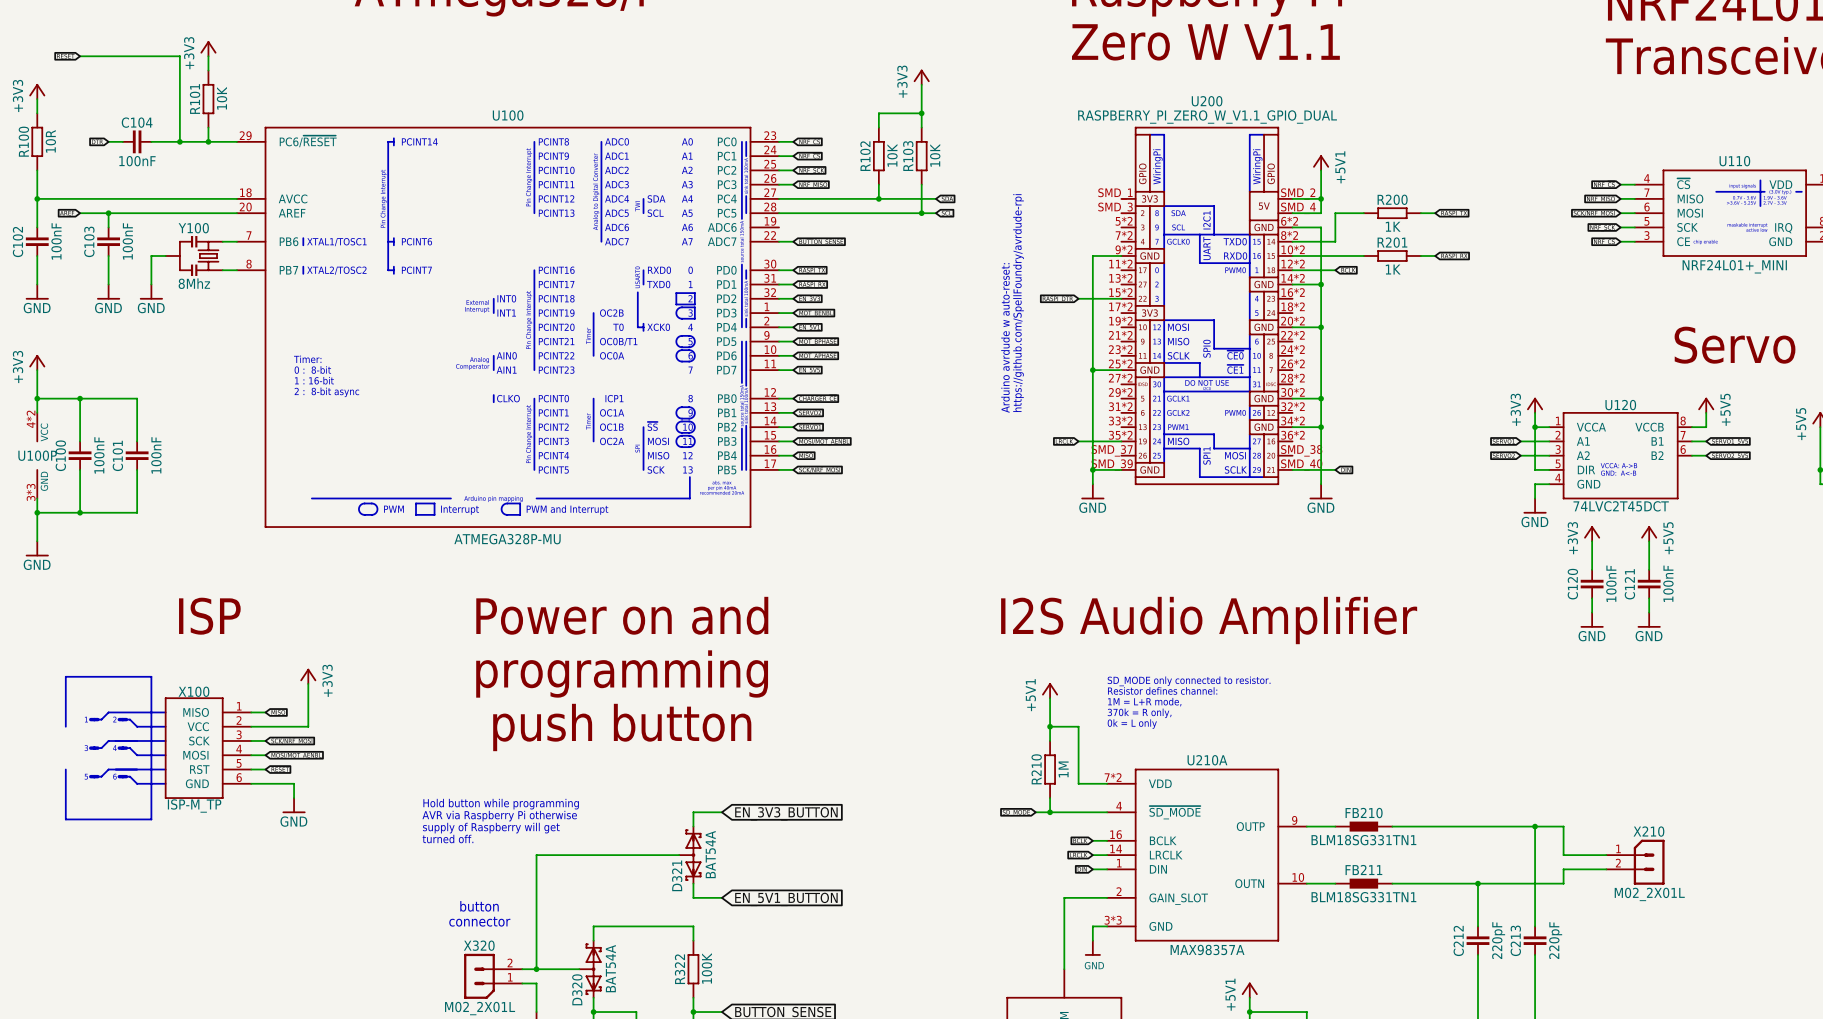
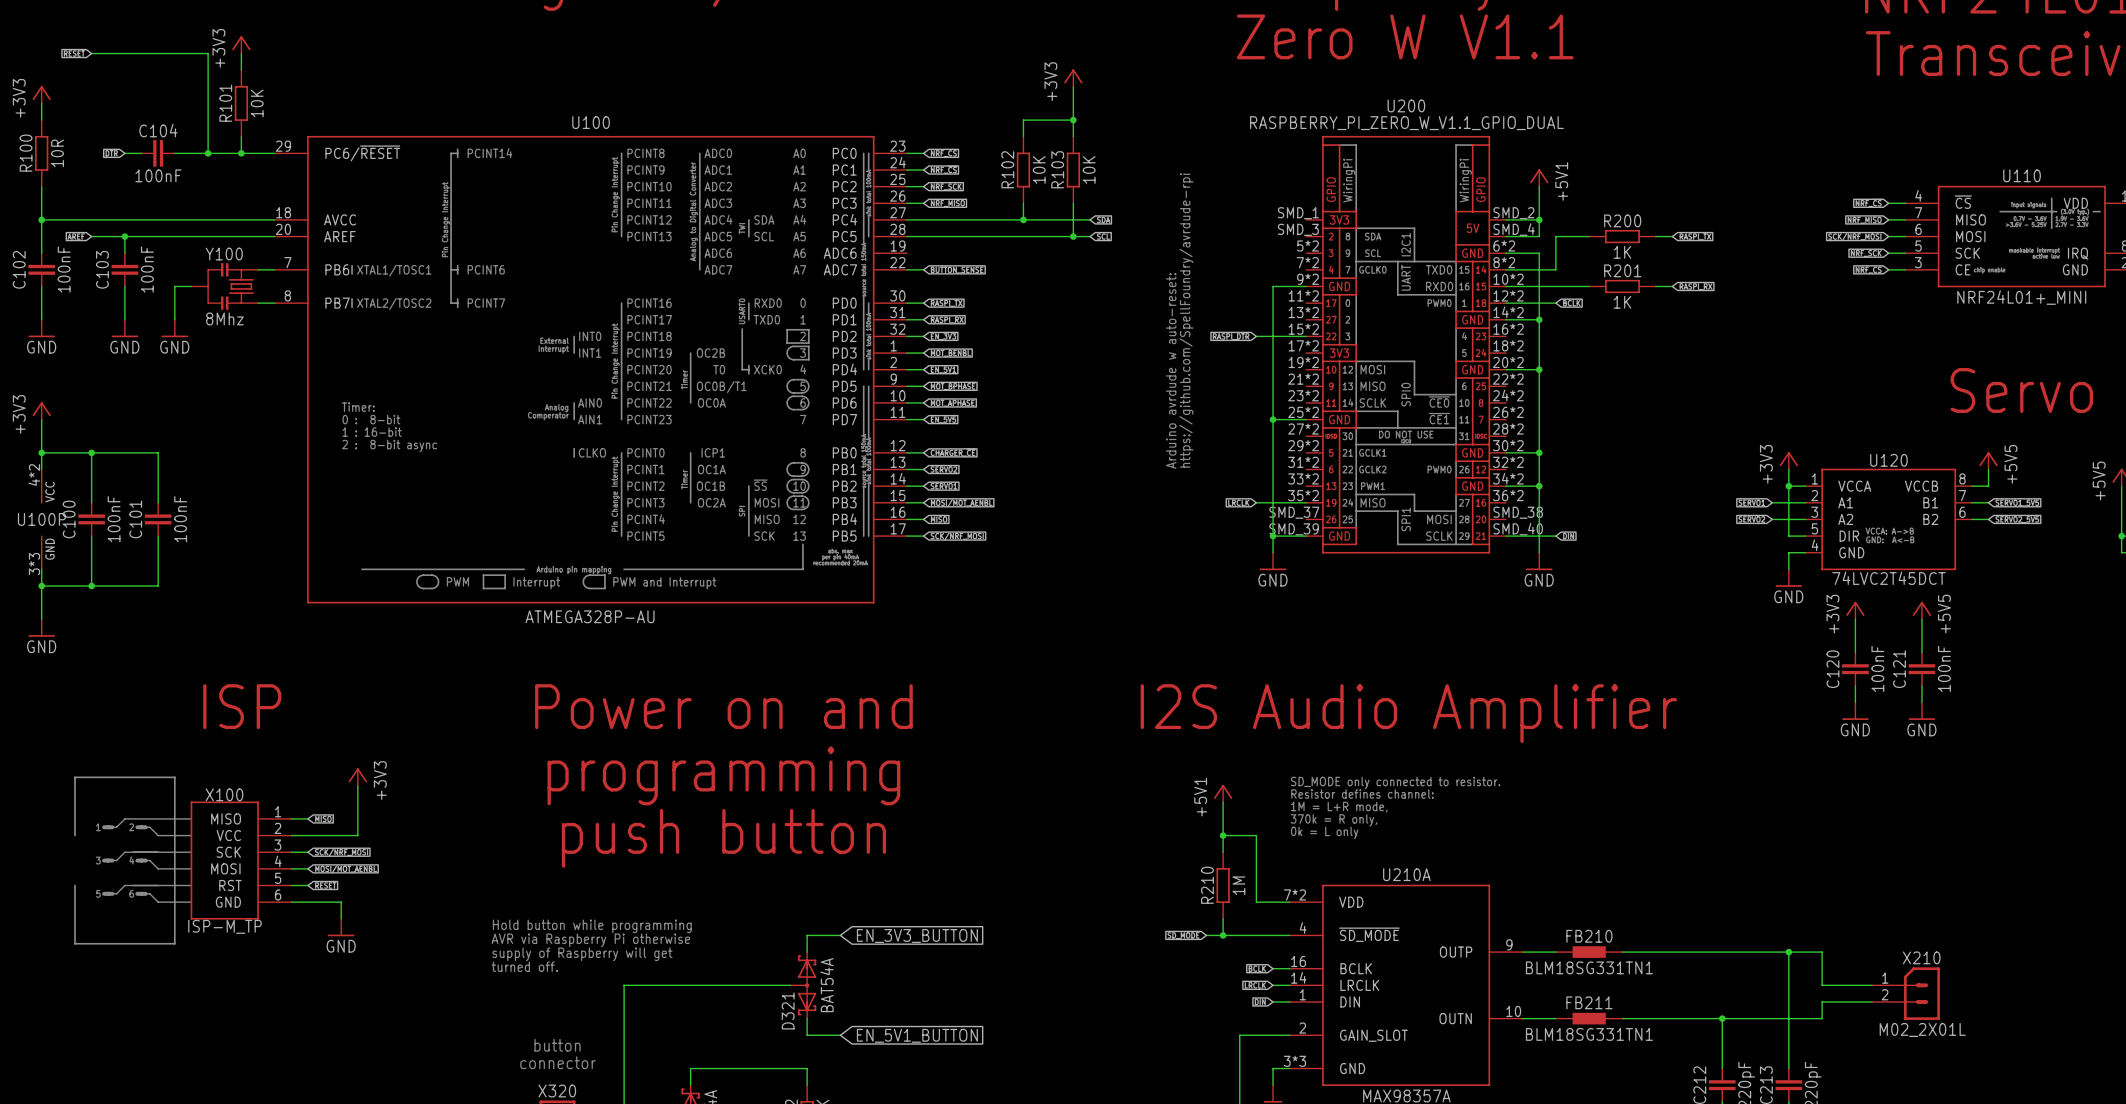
U100 value: ATMEGA328P-MU (507, 539) -> ATMEGA328P-AU (590, 616)

